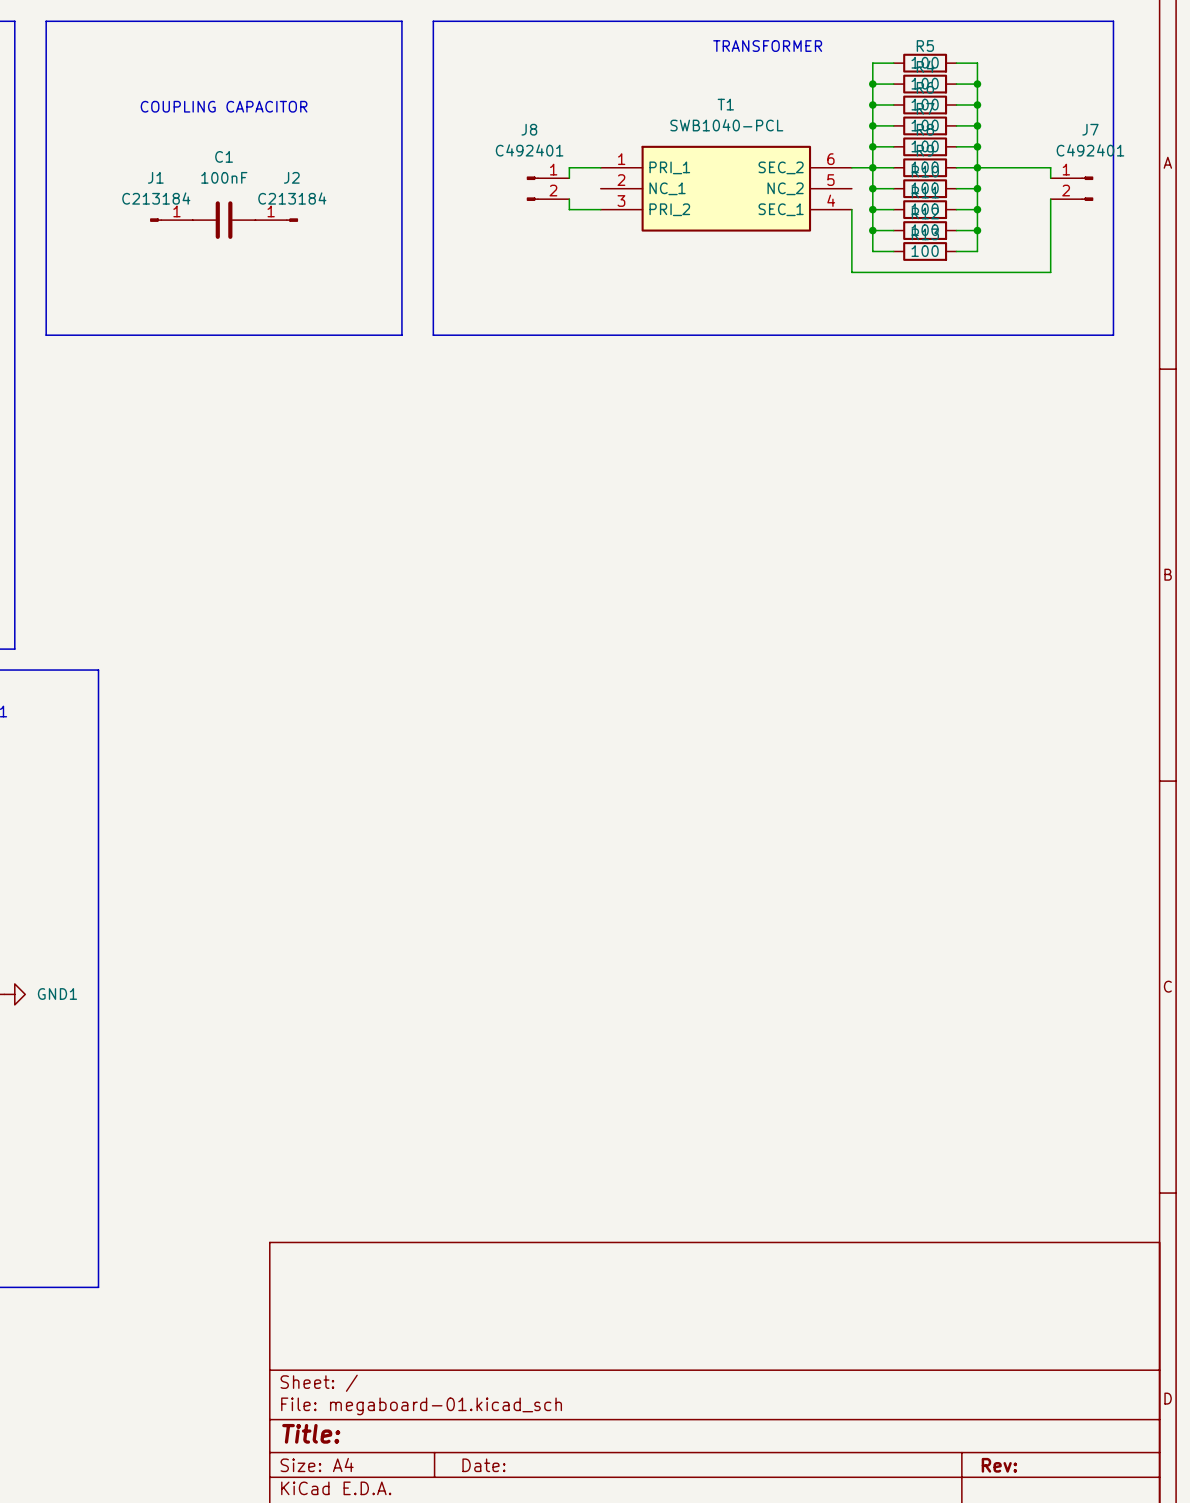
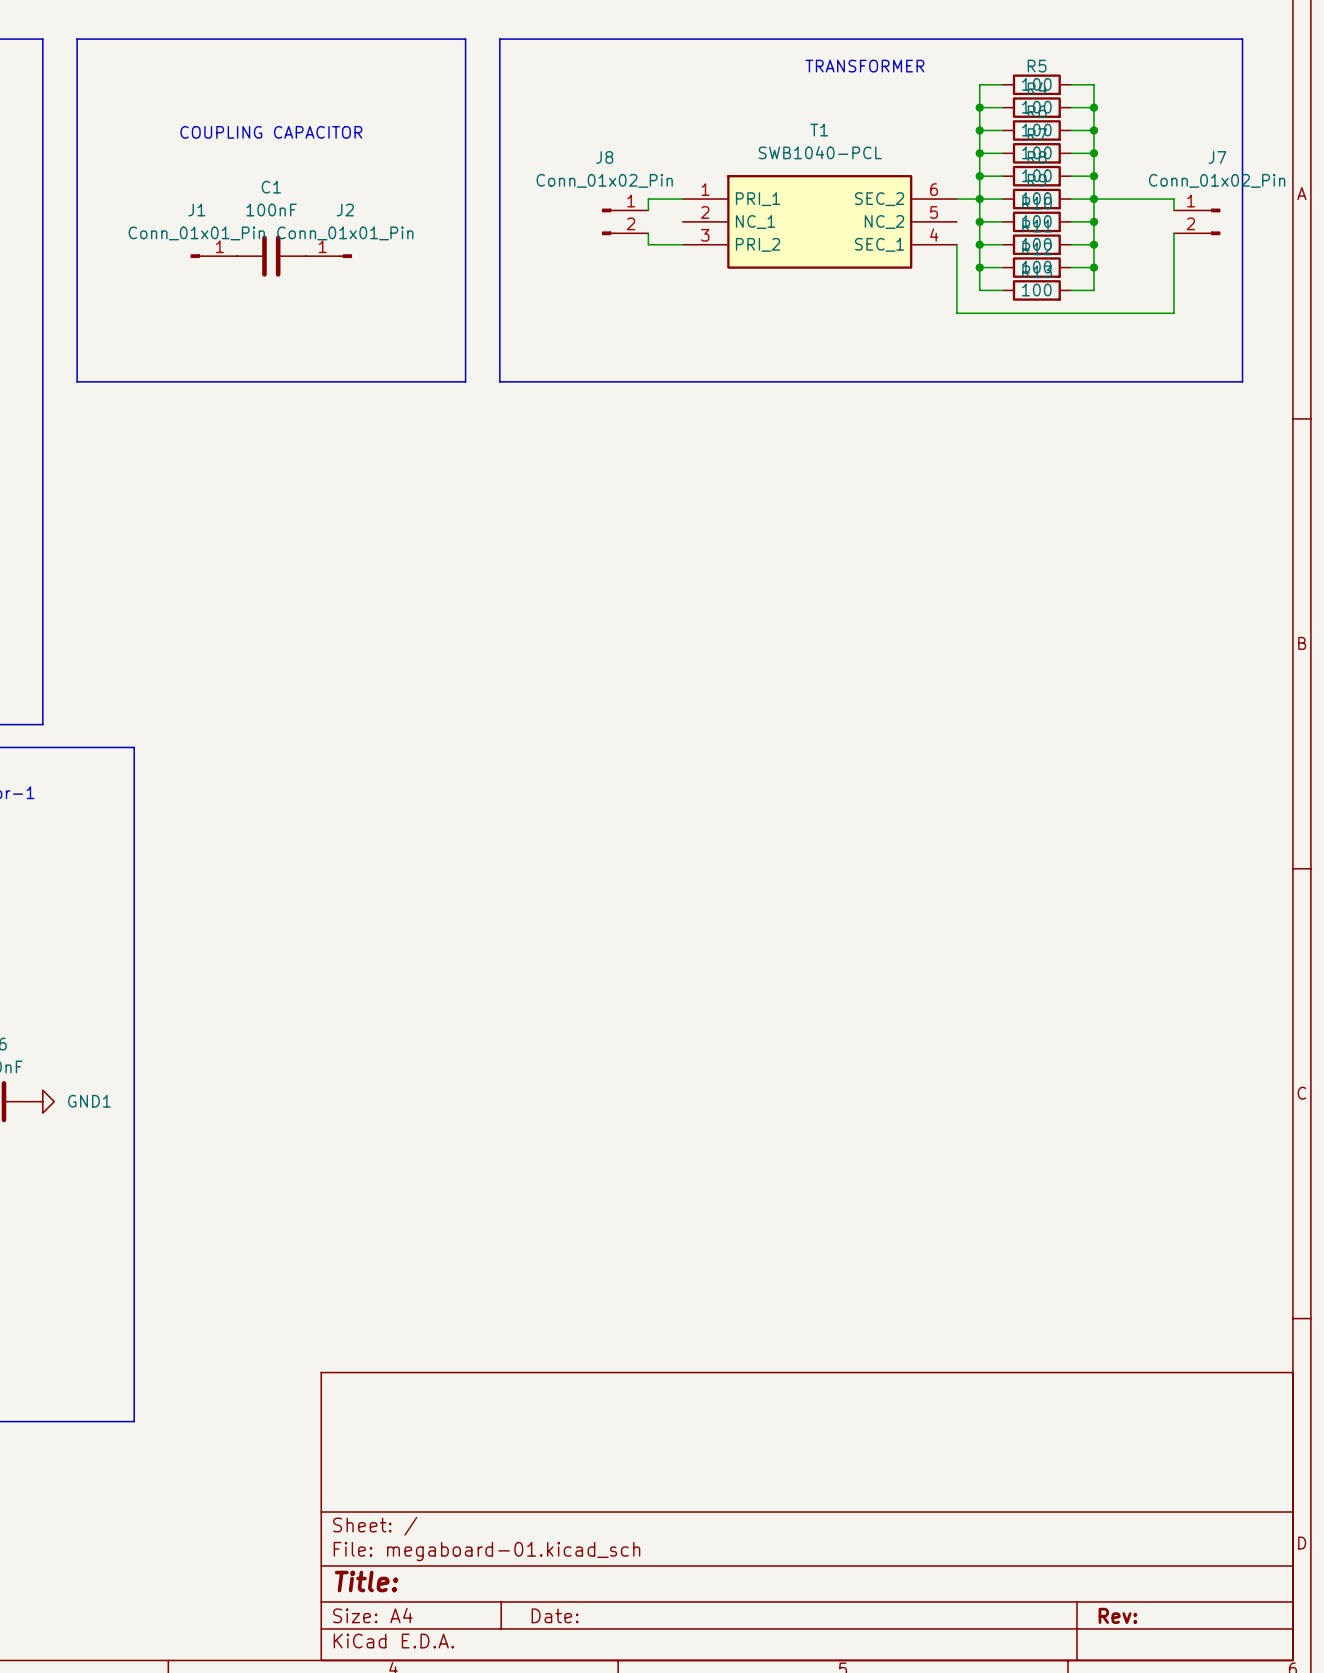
J8 value: C492401 (529, 150) -> Conn_01x02_Pin (604, 180)
J7 value: C492401 (1090, 150) -> Conn_01x02_Pin (1217, 180)
J1 value: C213184 (156, 198) -> Conn_01x01_Pin (196, 233)
J2 value: C213184 (292, 198) -> Conn_01x01_Pin (345, 233)

